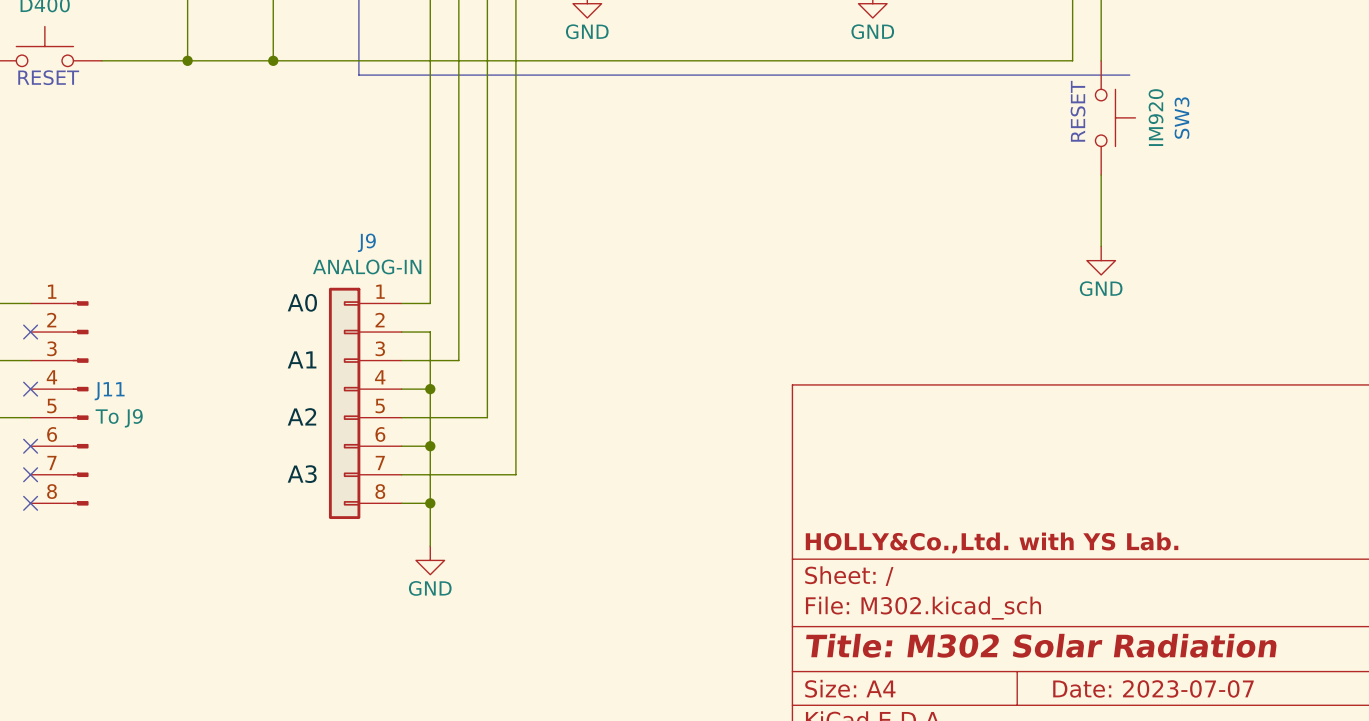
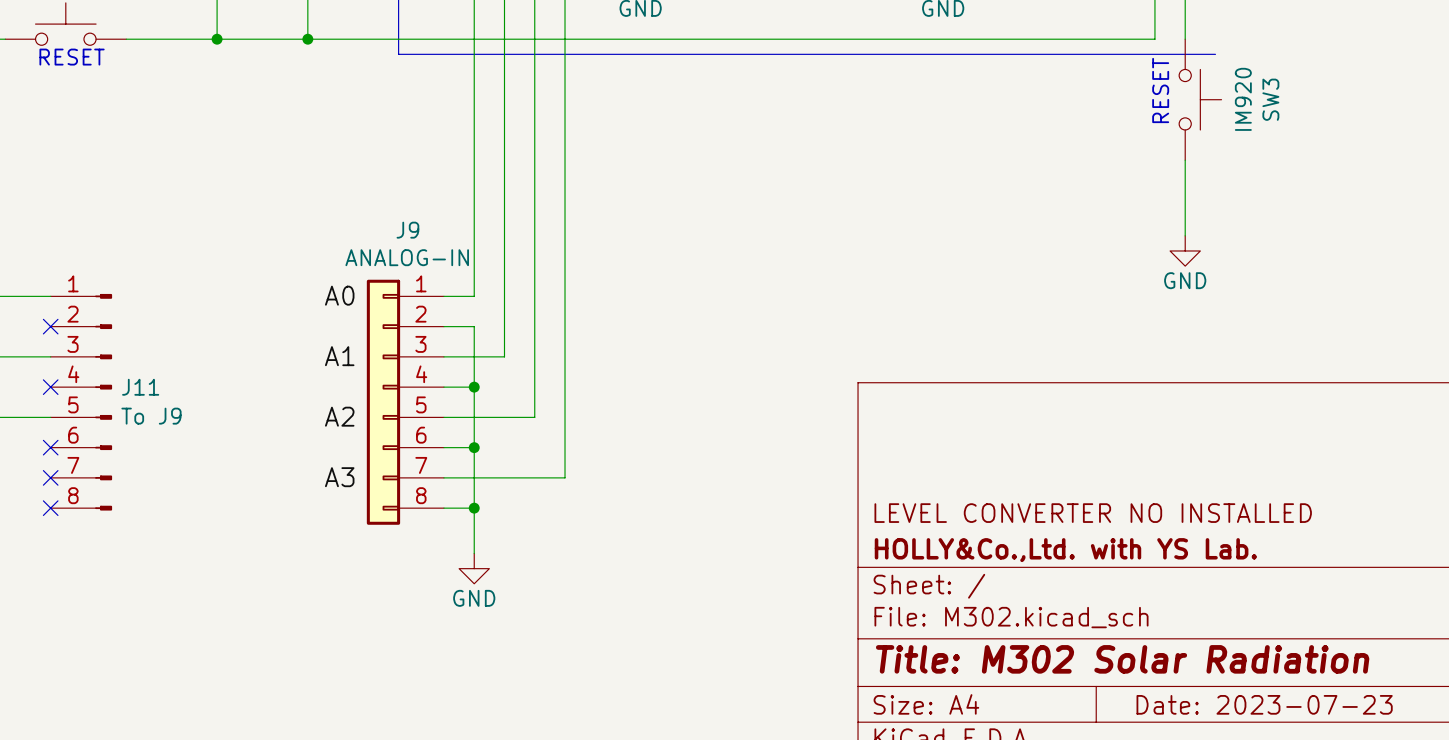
title block: none -> LEVEL CONVERTER NO INSTALLED (1093, 513)
title block: Date: 2023-07-07 (1153, 688) -> Date: 2023-07-23 (1264, 704)

